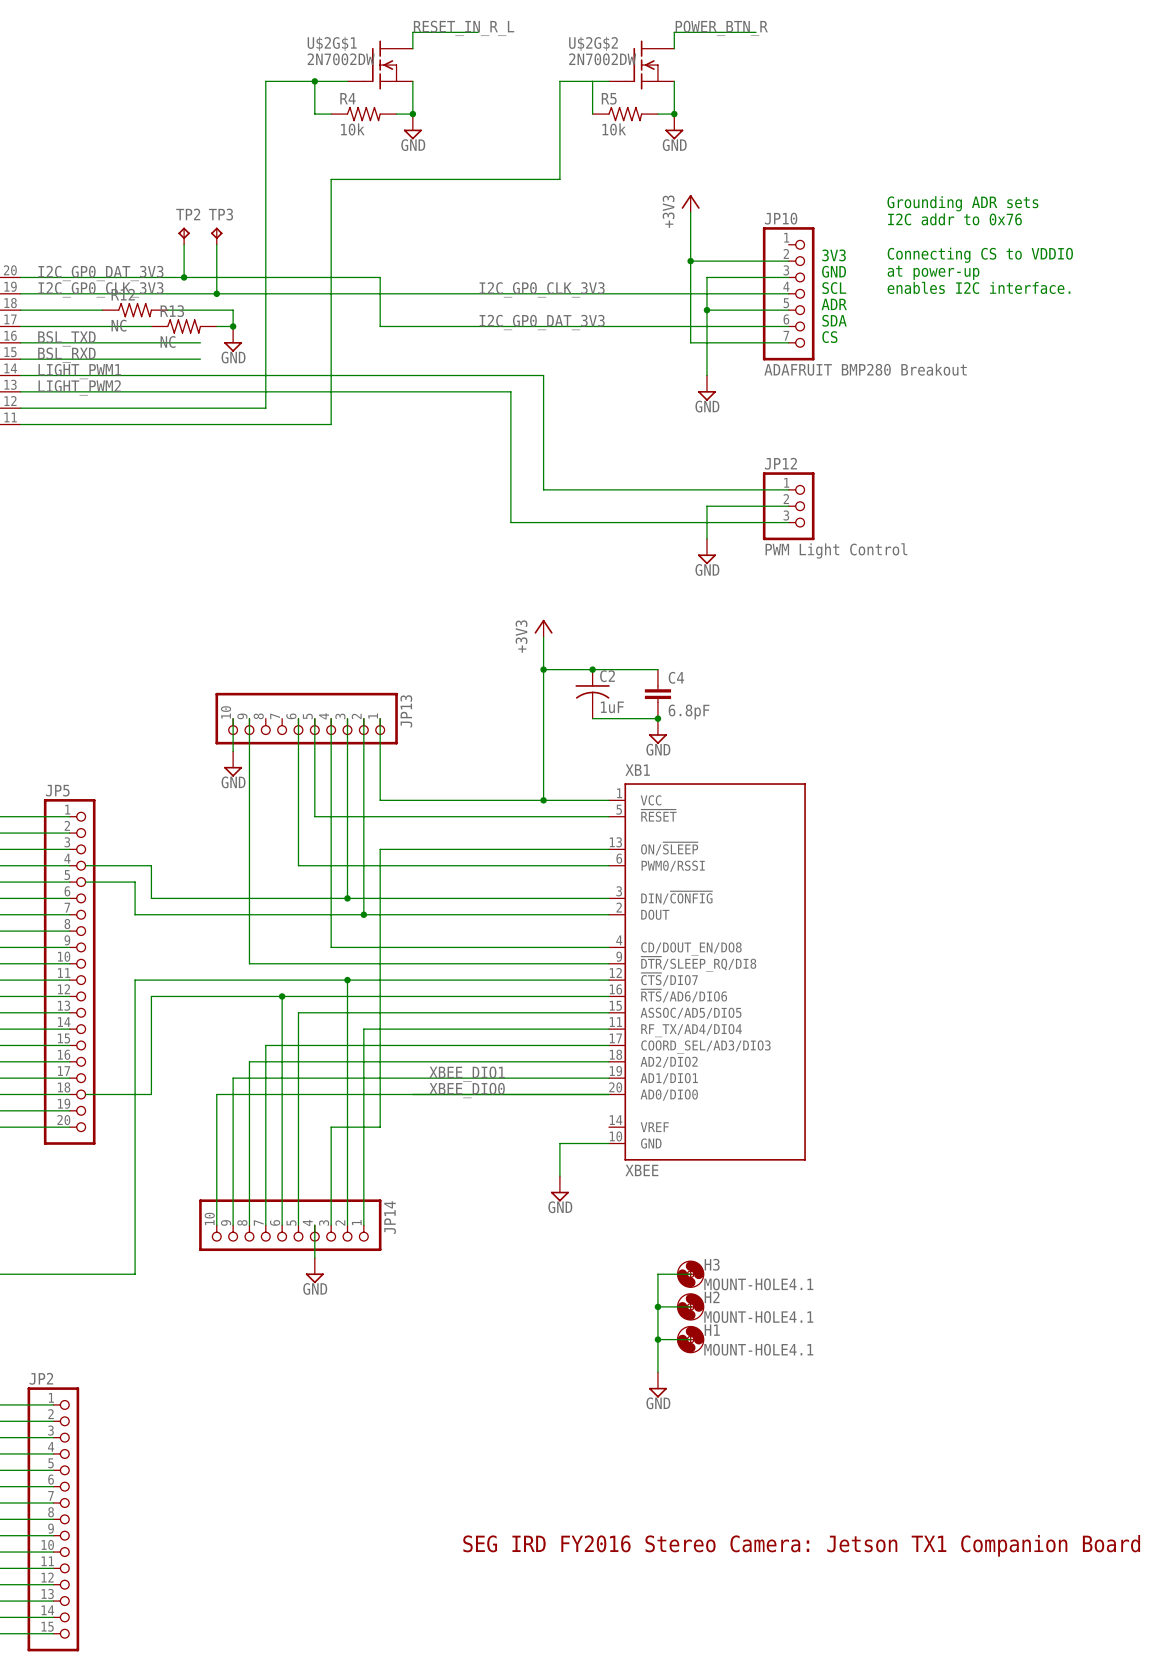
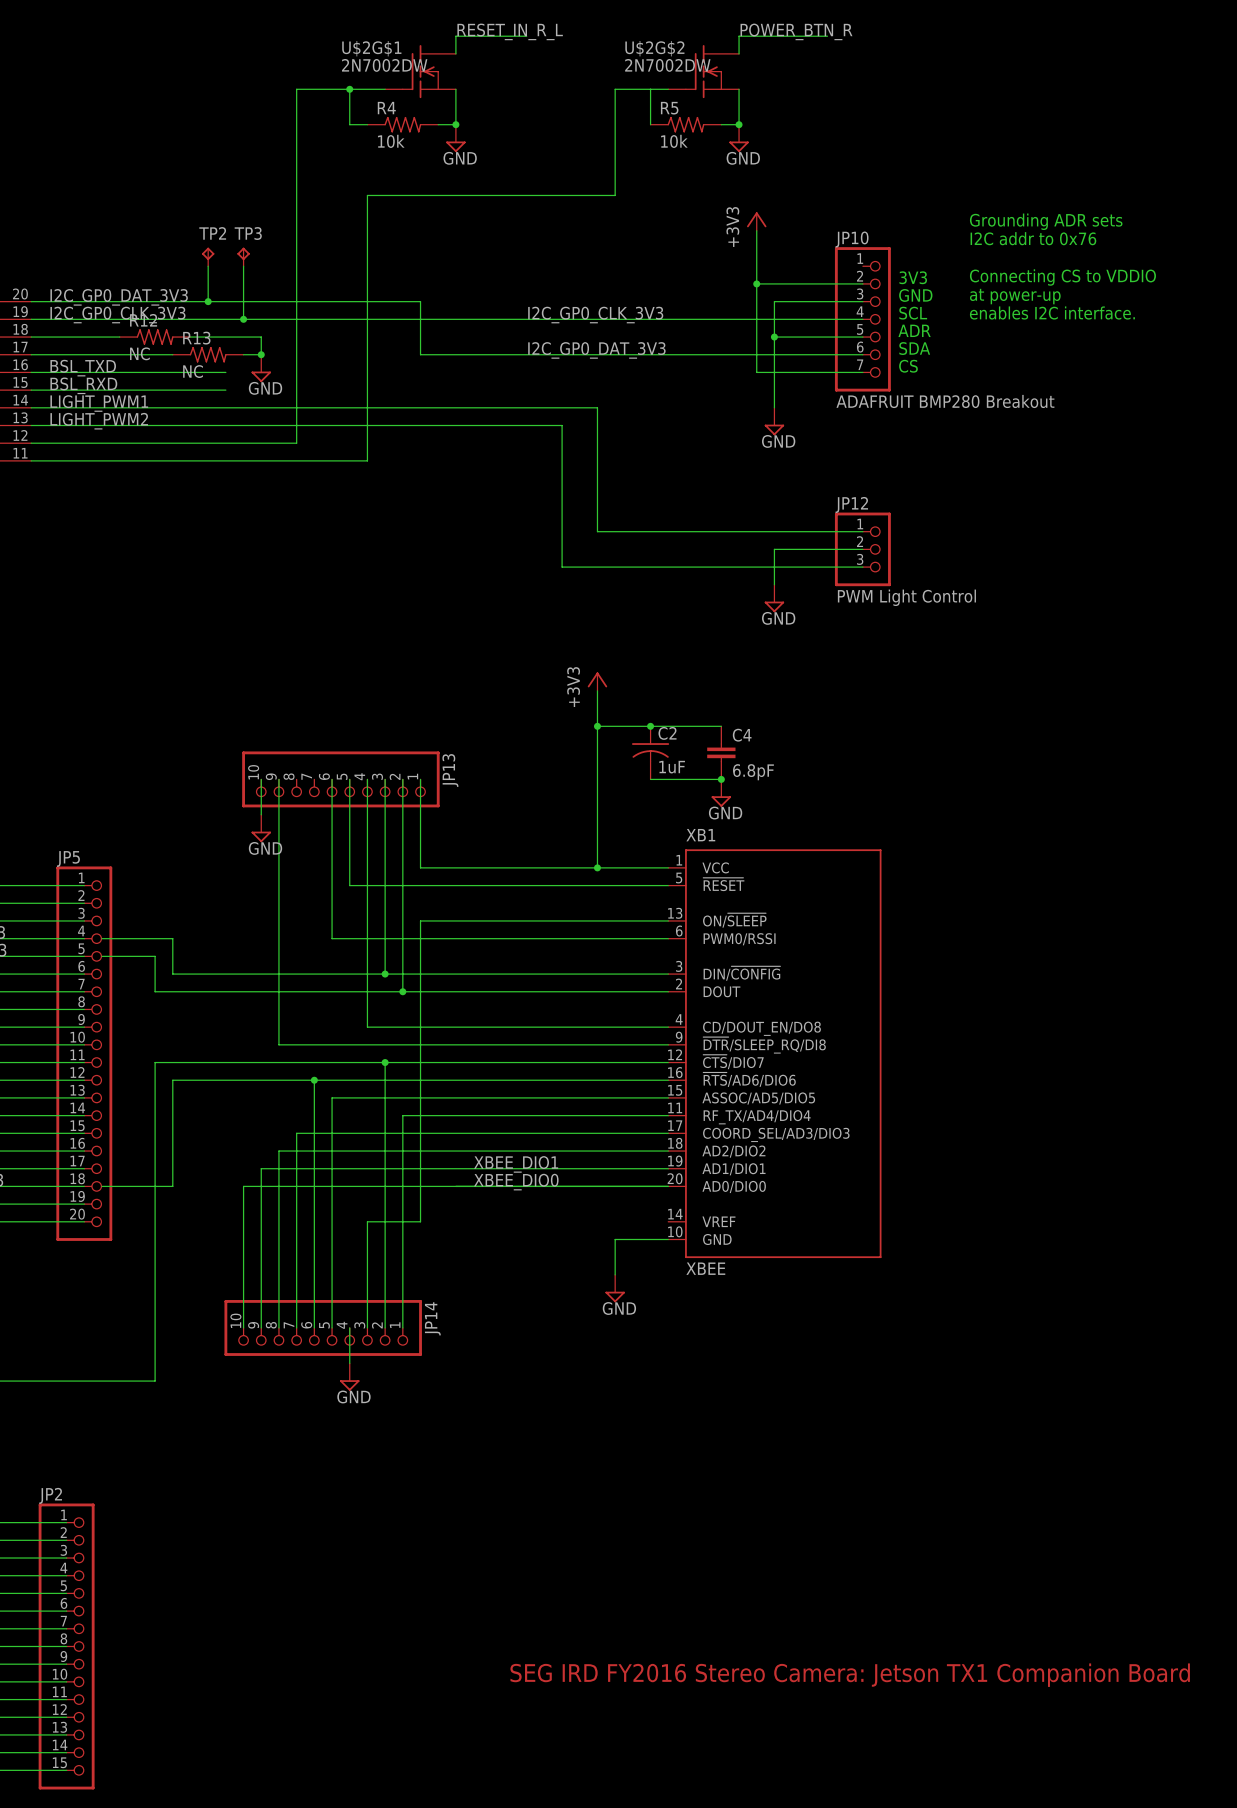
wire: (690, 1274) (657, 1274) (657, 1372) -> none
H3: MOUNT-HOLE4.1 (690, 1274) -> none
wire: (657, 1306) (690, 1306) -> none
junction: (657, 1306) -> none
H2: MOUNT-HOLE4.1 (690, 1306) -> none
wire: (657, 1339) (690, 1339) -> none
junction: (657, 1339) -> none
H1: MOUNT-HOLE4.1 (690, 1339) -> none
power symbol: GND (657, 1384) -> none

